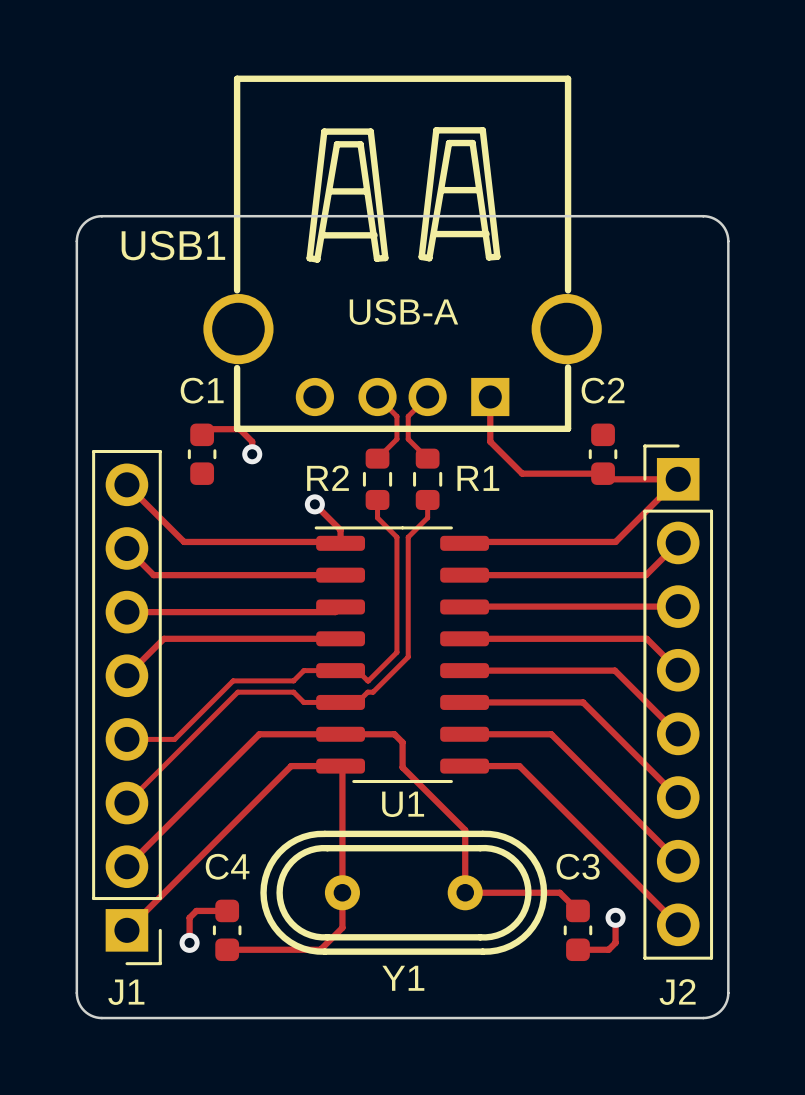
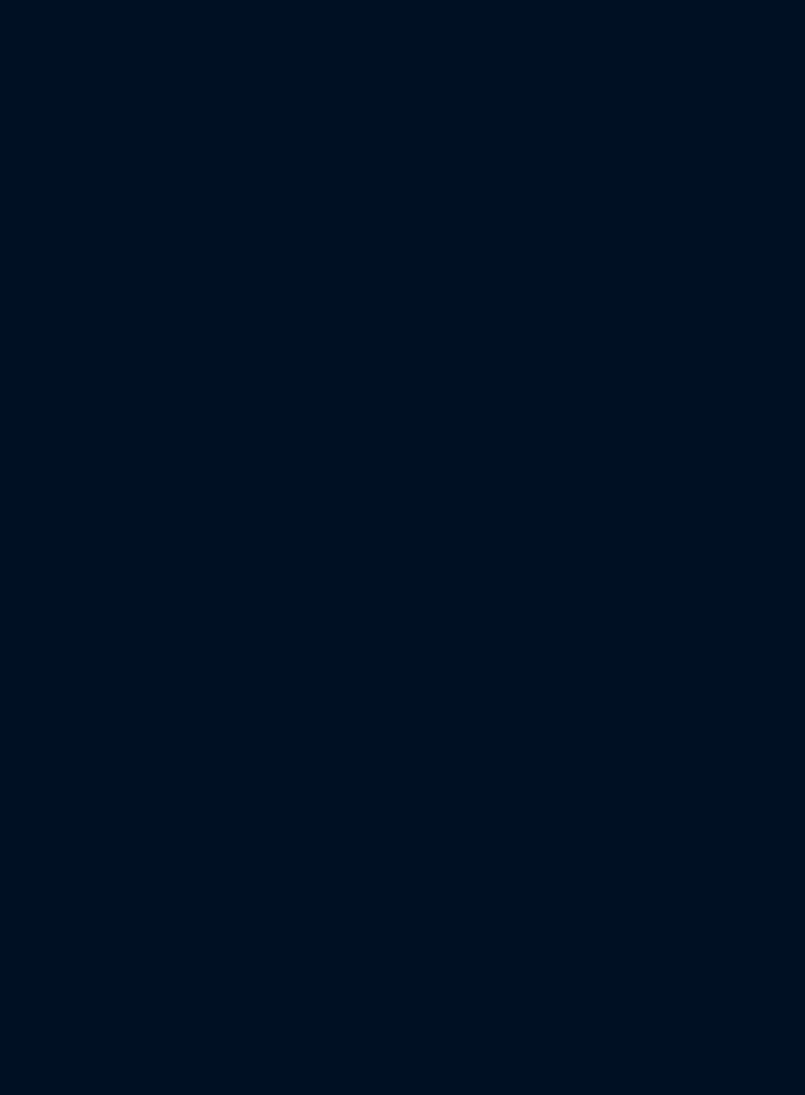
board edge: (101, 216) (703, 216) (714, 218) (722, 225) (728, 241) (728, 992) (725, 1003) (718, 1012) (703, 1018) (101, 1018) (91, 1015) (82, 1008) (76, 992) (76, 241) (78, 232) (84, 223) (91, 218) (101, 216) -> none
USB1: (402, 253) -> none
track: (377, 396) (396, 416) (396, 439) (377, 458) -> none
track: (427, 396) (408, 416) (408, 439) (427, 458) -> none
track: (490, 396) (490, 441) (522, 473) (603, 473) (608, 479) (678, 479) (615, 541) (464, 543) -> none
track: (202, 434) (207, 429) (239, 429) (252, 441) (252, 454) -> none
C1: (202, 454) -> none
via: (252, 454) -> none
C2: (603, 454) -> none
R2: (377, 479) -> none
R1: (427, 479) -> none
track: (126, 484) (184, 541) (340, 543) (340, 530) (314, 504) -> none
track: (377, 499) (377, 517) (396, 537) (396, 652) (368, 680) (357, 670) (303, 670) (293, 680) (233, 680) (174, 739) (126, 739) -> none
track: (427, 499) (427, 517) (408, 537) (408, 657) (373, 692) (367, 692) (357, 702) (303, 702) (293, 692) (237, 692) (126, 803) -> none
via: (314, 504) -> none
track: (678, 542) (646, 575) (464, 575) -> none
track: (126, 548) (153, 575) (340, 575) -> none
track: (126, 604) (126, 612) (335, 612) (340, 606) -> none
track: (678, 606) (464, 606) -> none
track: (340, 638) (163, 638) (126, 675) -> none
track: (464, 638) (646, 638) (678, 670) -> none
U1: (401, 654) -> none
track: (464, 670) (614, 670) (678, 733) -> none
track: (464, 702) (583, 702) (678, 797) -> none
J2: (678, 702) -> none
J1: (126, 707) -> none
track: (464, 734) (551, 734) (678, 861) -> none
track: (340, 766) (291, 766) (126, 930) -> none
track: (340, 766) (342, 767) (342, 927) (320, 949) (227, 949) -> none
track: (464, 766) (519, 766) (678, 924) -> none
track: (126, 866) (259, 734) (394, 734) (402, 742) (402, 767) (465, 830) (465, 892) (559, 892) (577, 910) -> none
Y1: (403, 892) -> none
track: (227, 910) (196, 910) (189, 917) (189, 942) -> none
track: (615, 917) (615, 942) (608, 949) (577, 949) -> none
via: (615, 917) -> none
C4: (227, 930) -> none
C3: (577, 930) -> none
via: (189, 942) -> none

